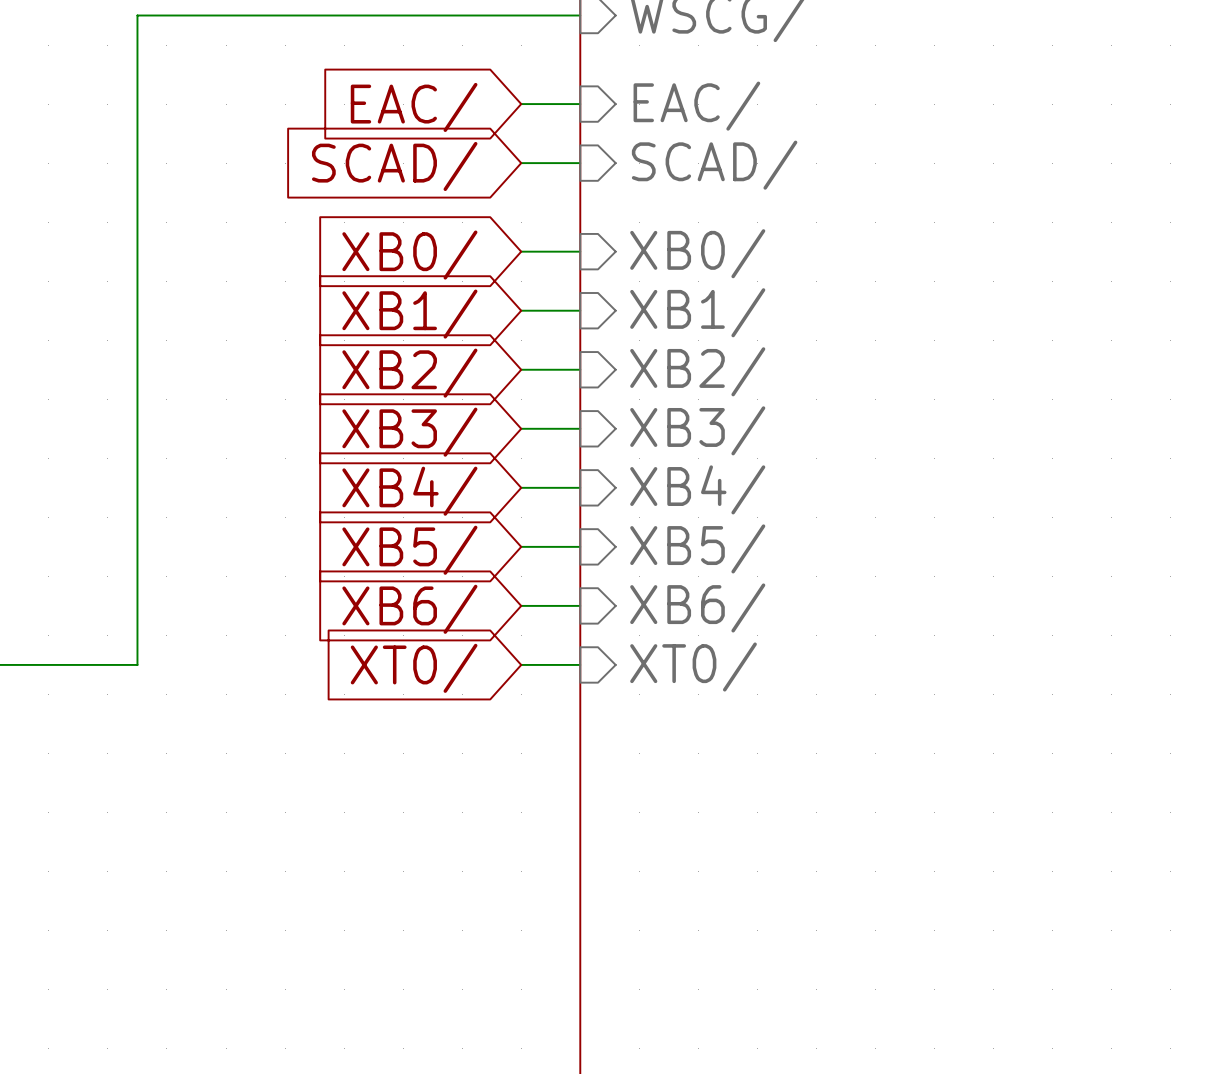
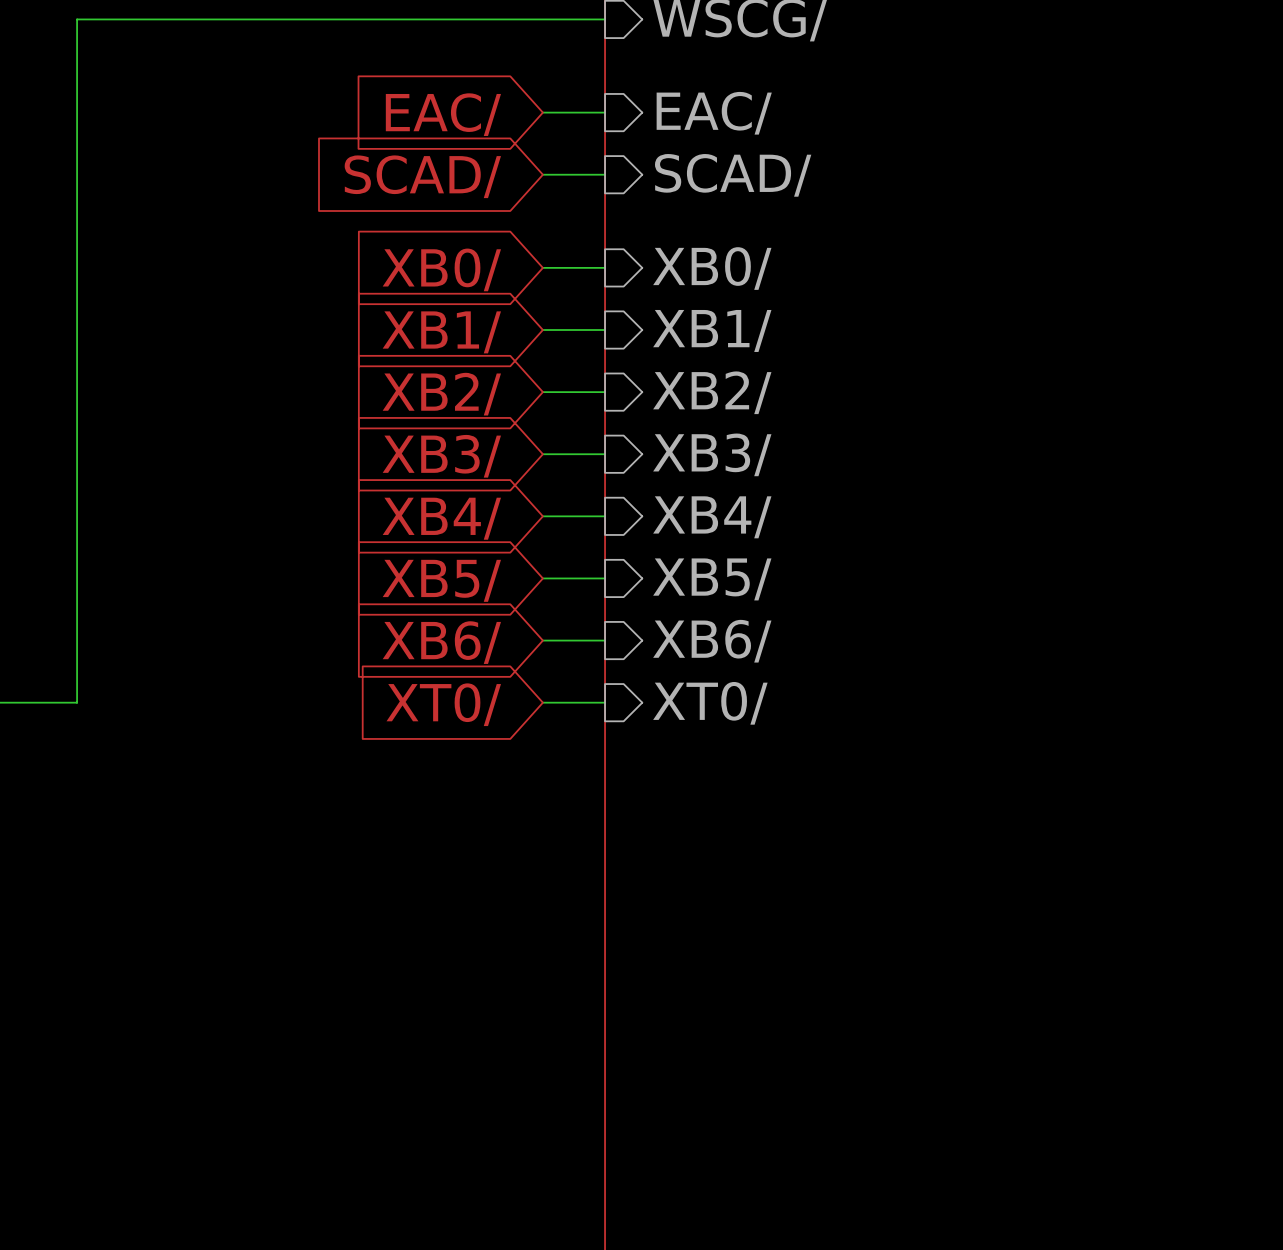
wire: (137, 15) (137, 664) (78, 664) -> (139, 19) (77, 19) (77, 702)

